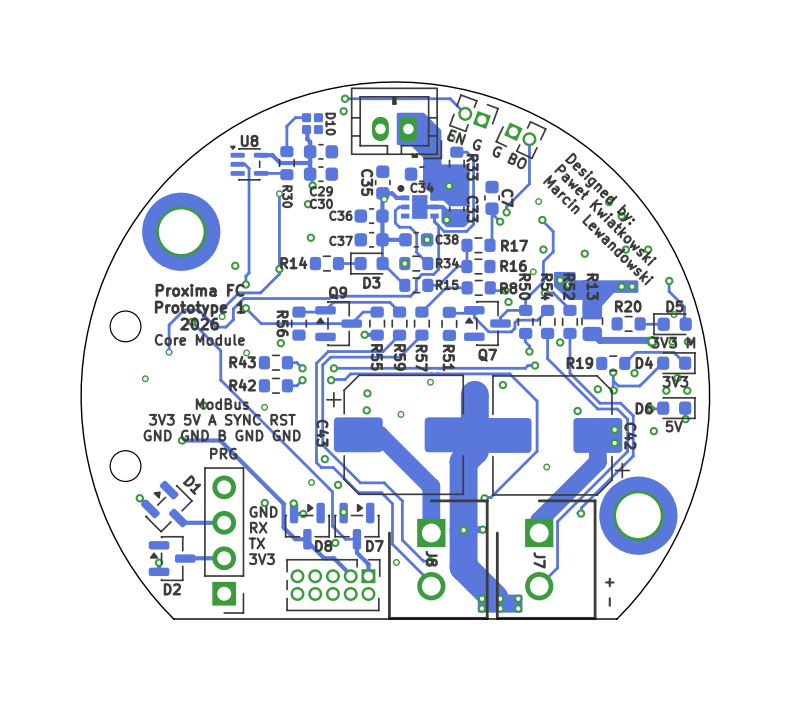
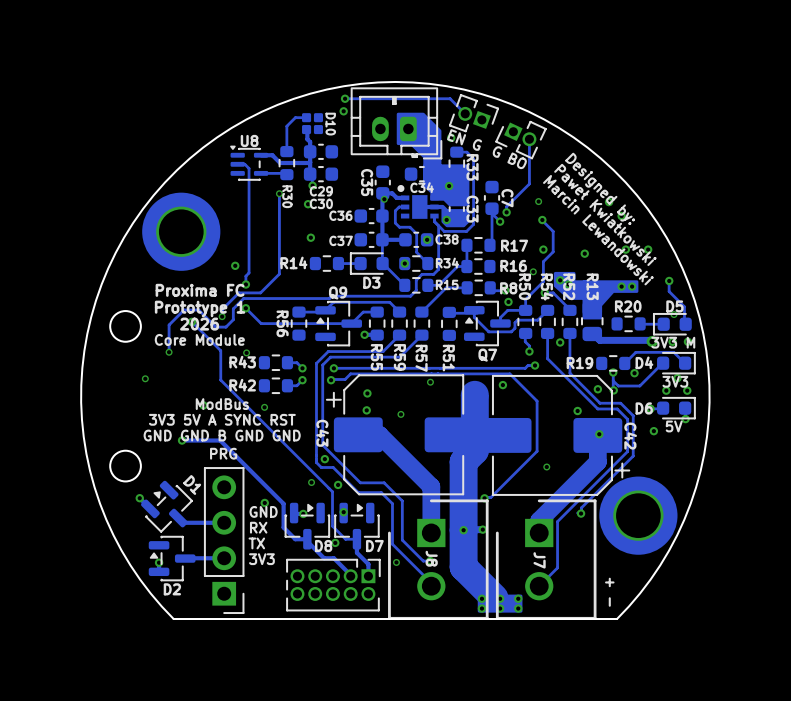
via: (279, 269) -> none
via: (280, 343) -> none
via: (614, 429) -> none
via: none -> (599, 434)
via: (614, 443) -> none
via: (293, 503) -> none

